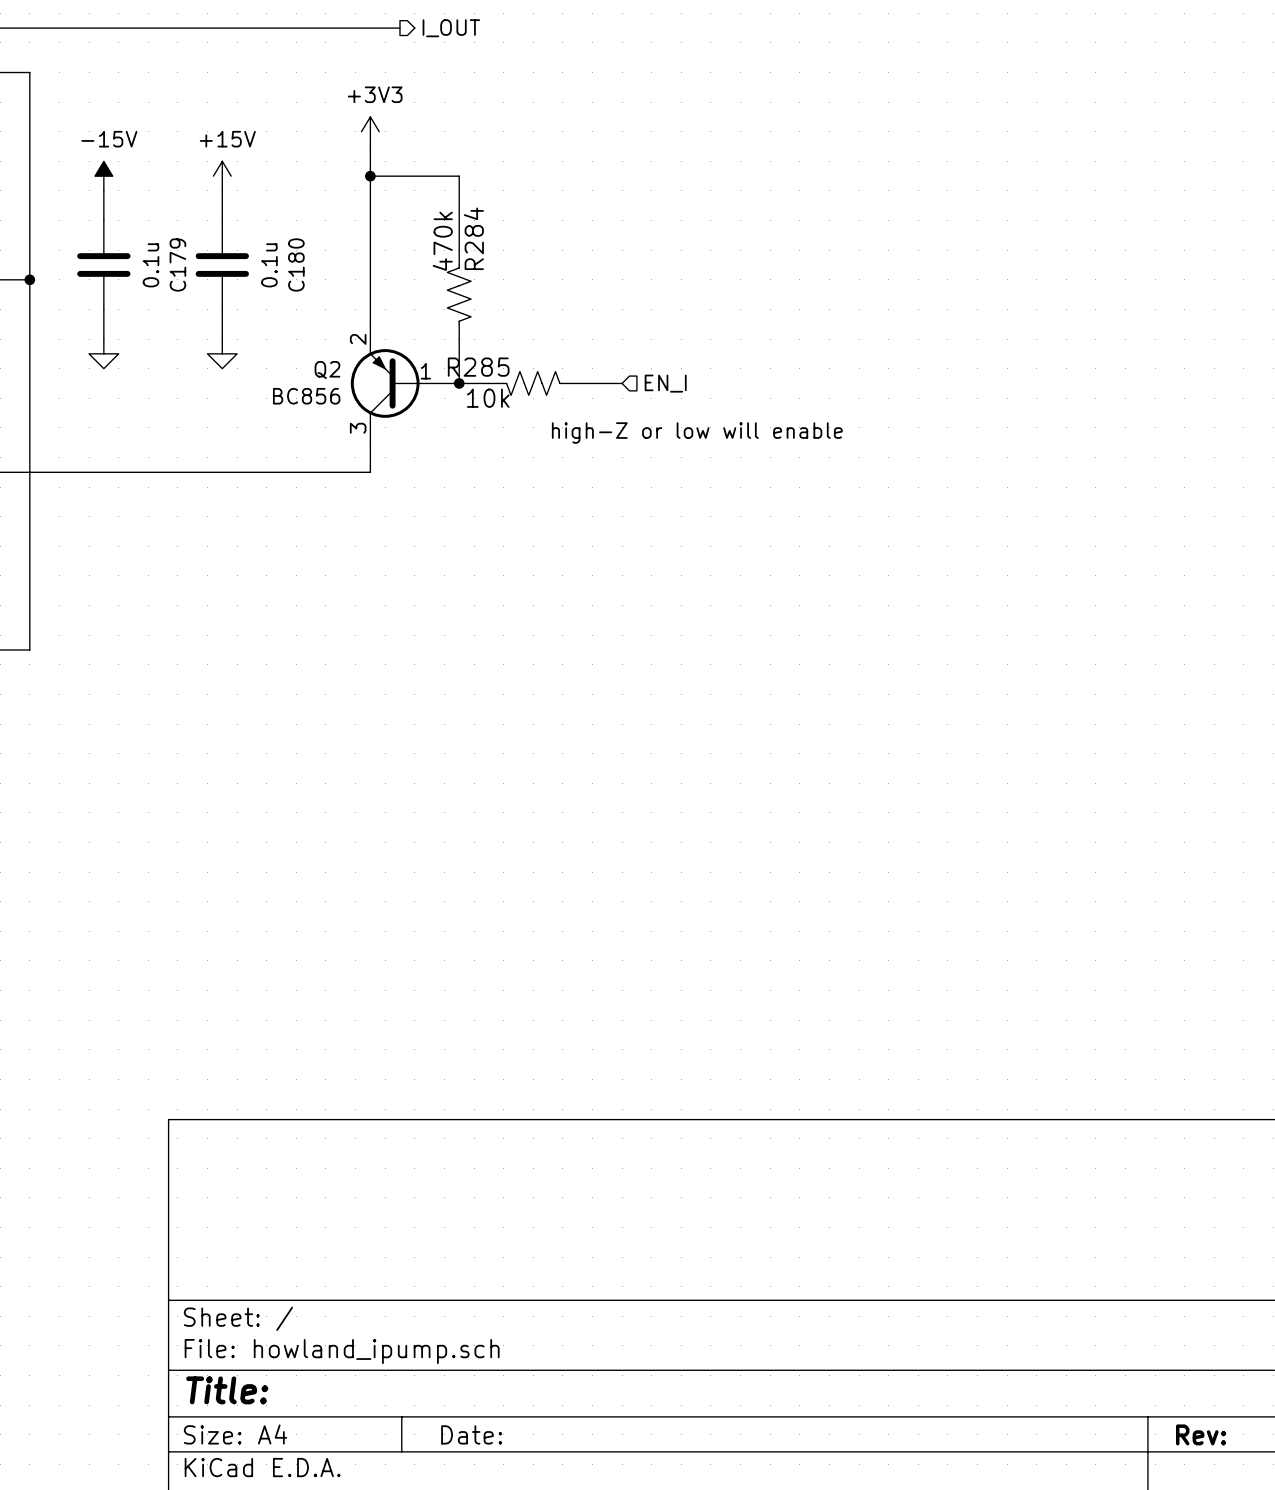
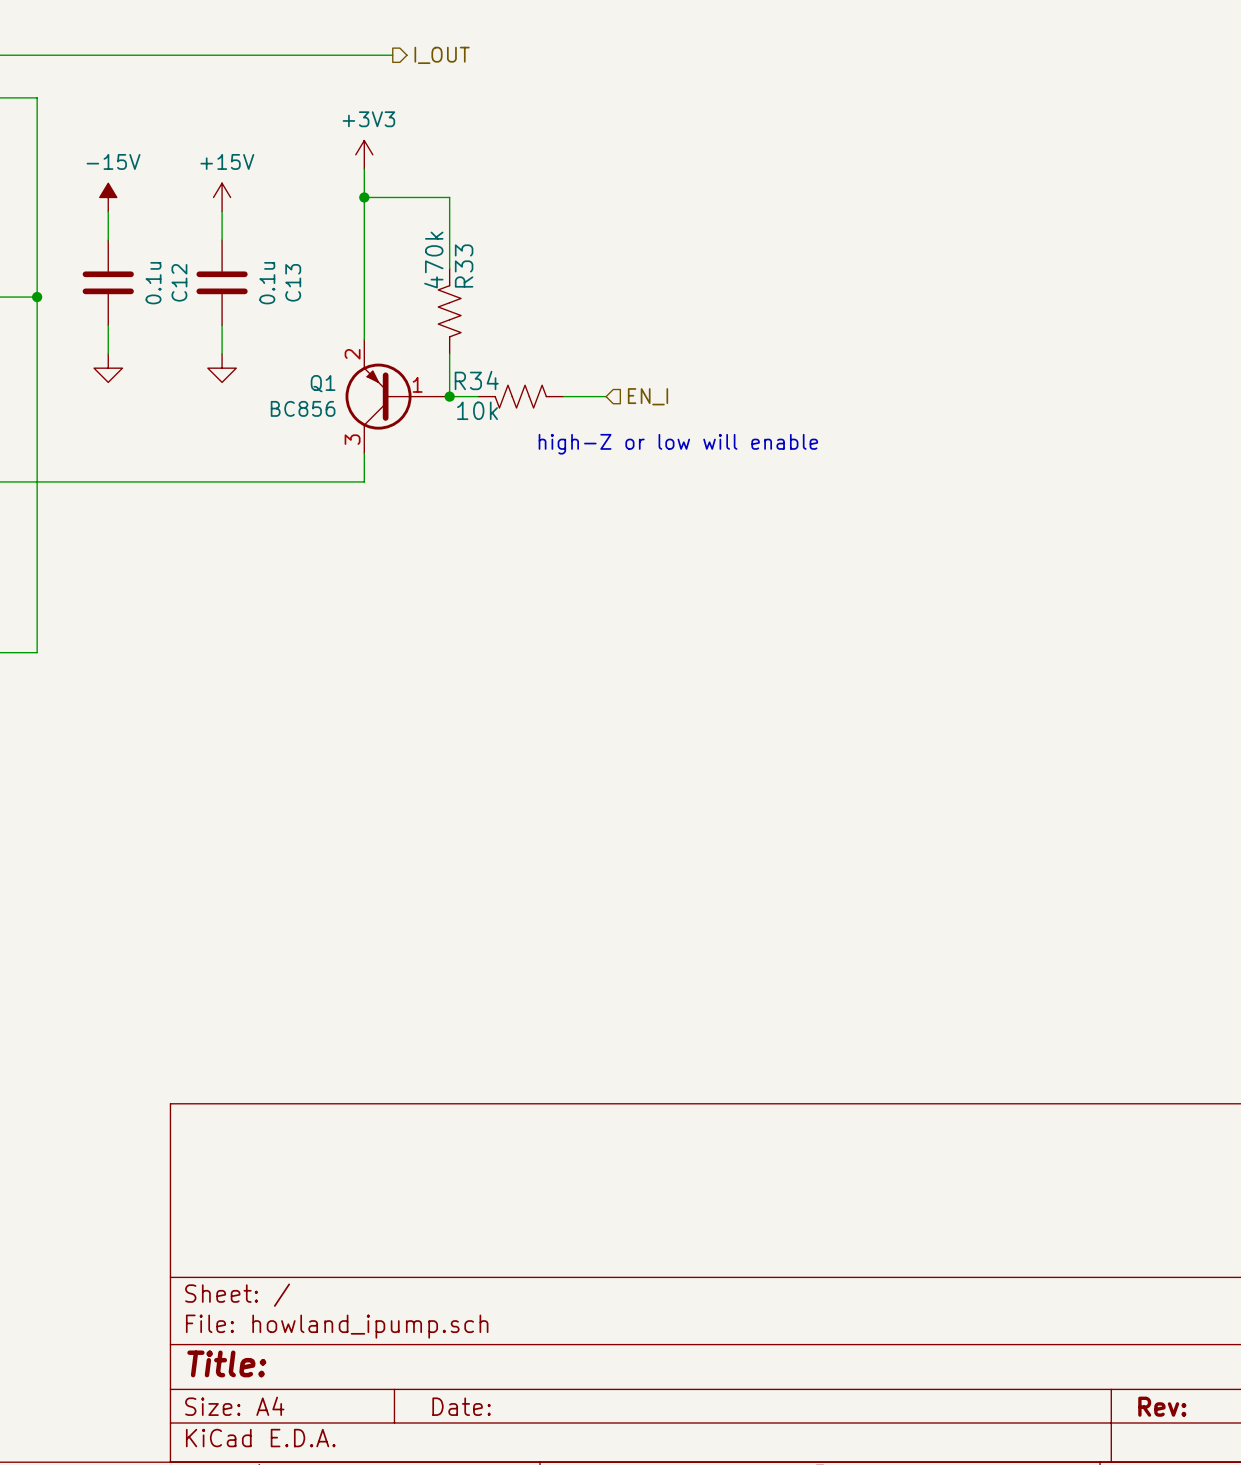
R284 name: R284 (473, 238) -> R33 (464, 266)
C179 name: C179 (177, 265) -> C12 (179, 282)
C180 name: C180 (296, 265) -> C13 (293, 282)
R285 name: R285 (478, 367) -> R34 (476, 380)
Q2 name: Q2 (327, 369) -> Q1 (323, 383)

